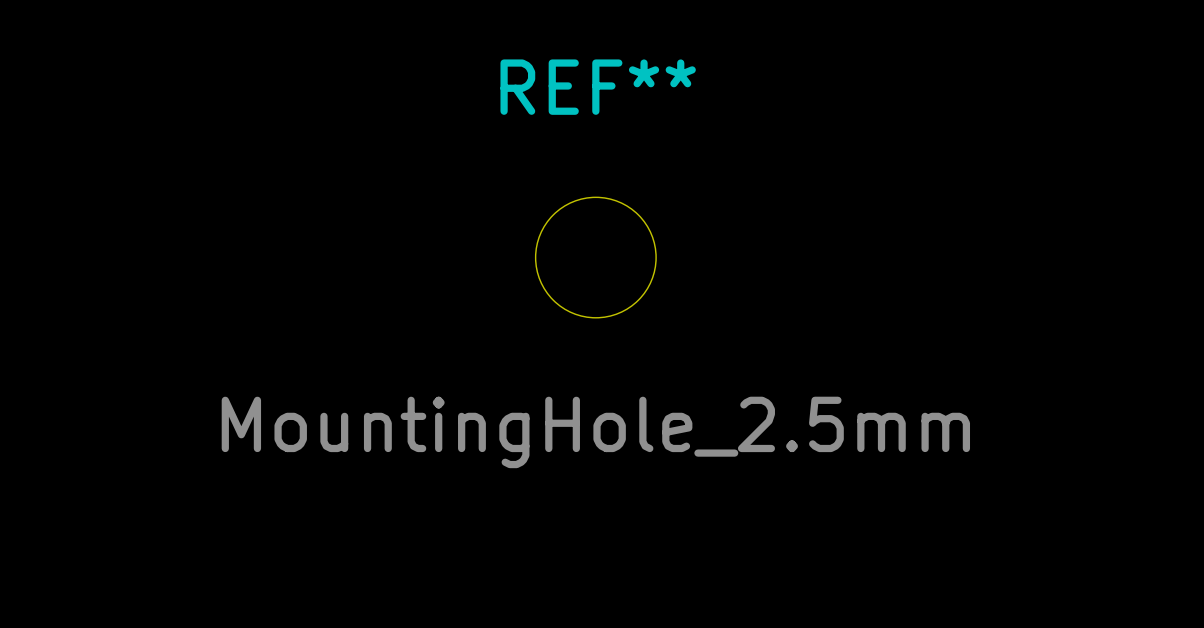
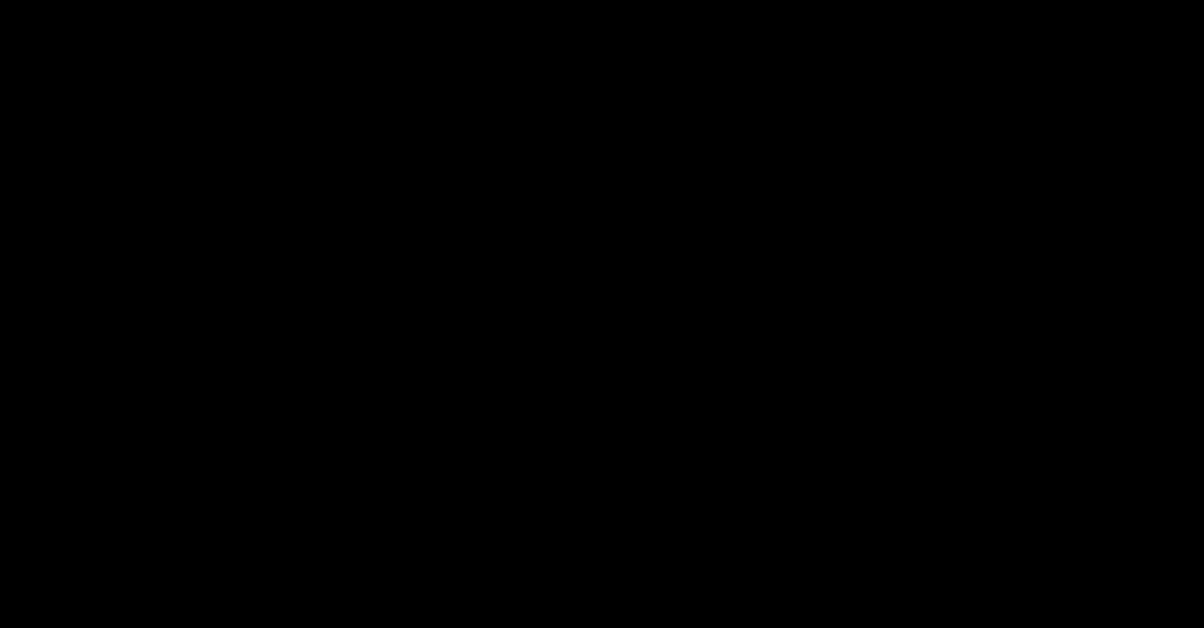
REF**: MountingHole_2.5mm (595, 257) -> none

